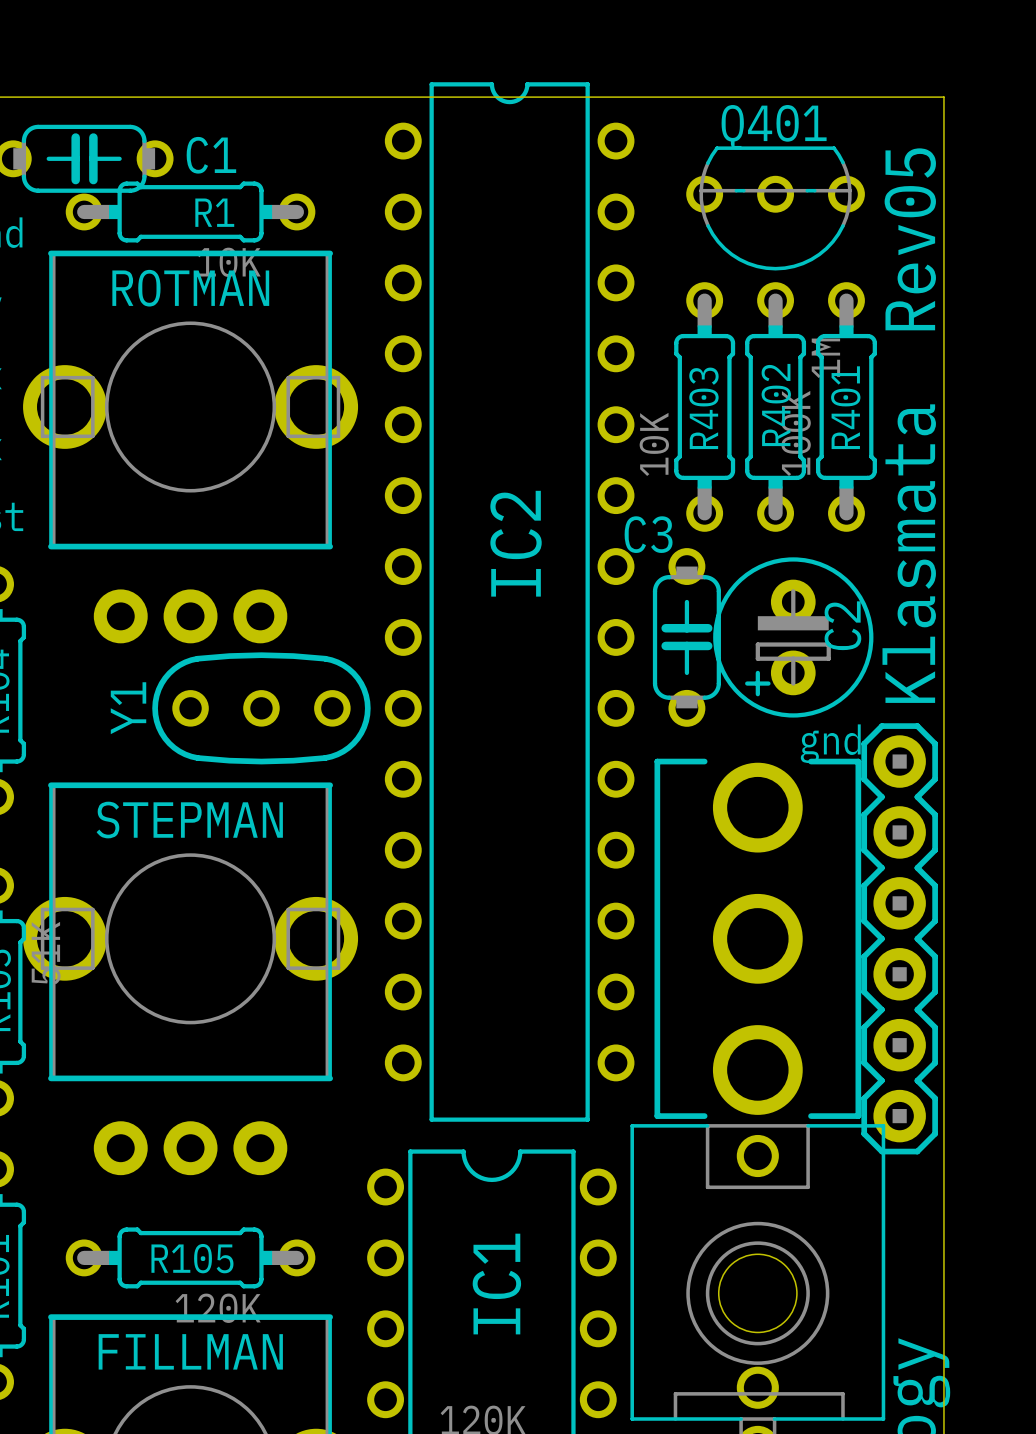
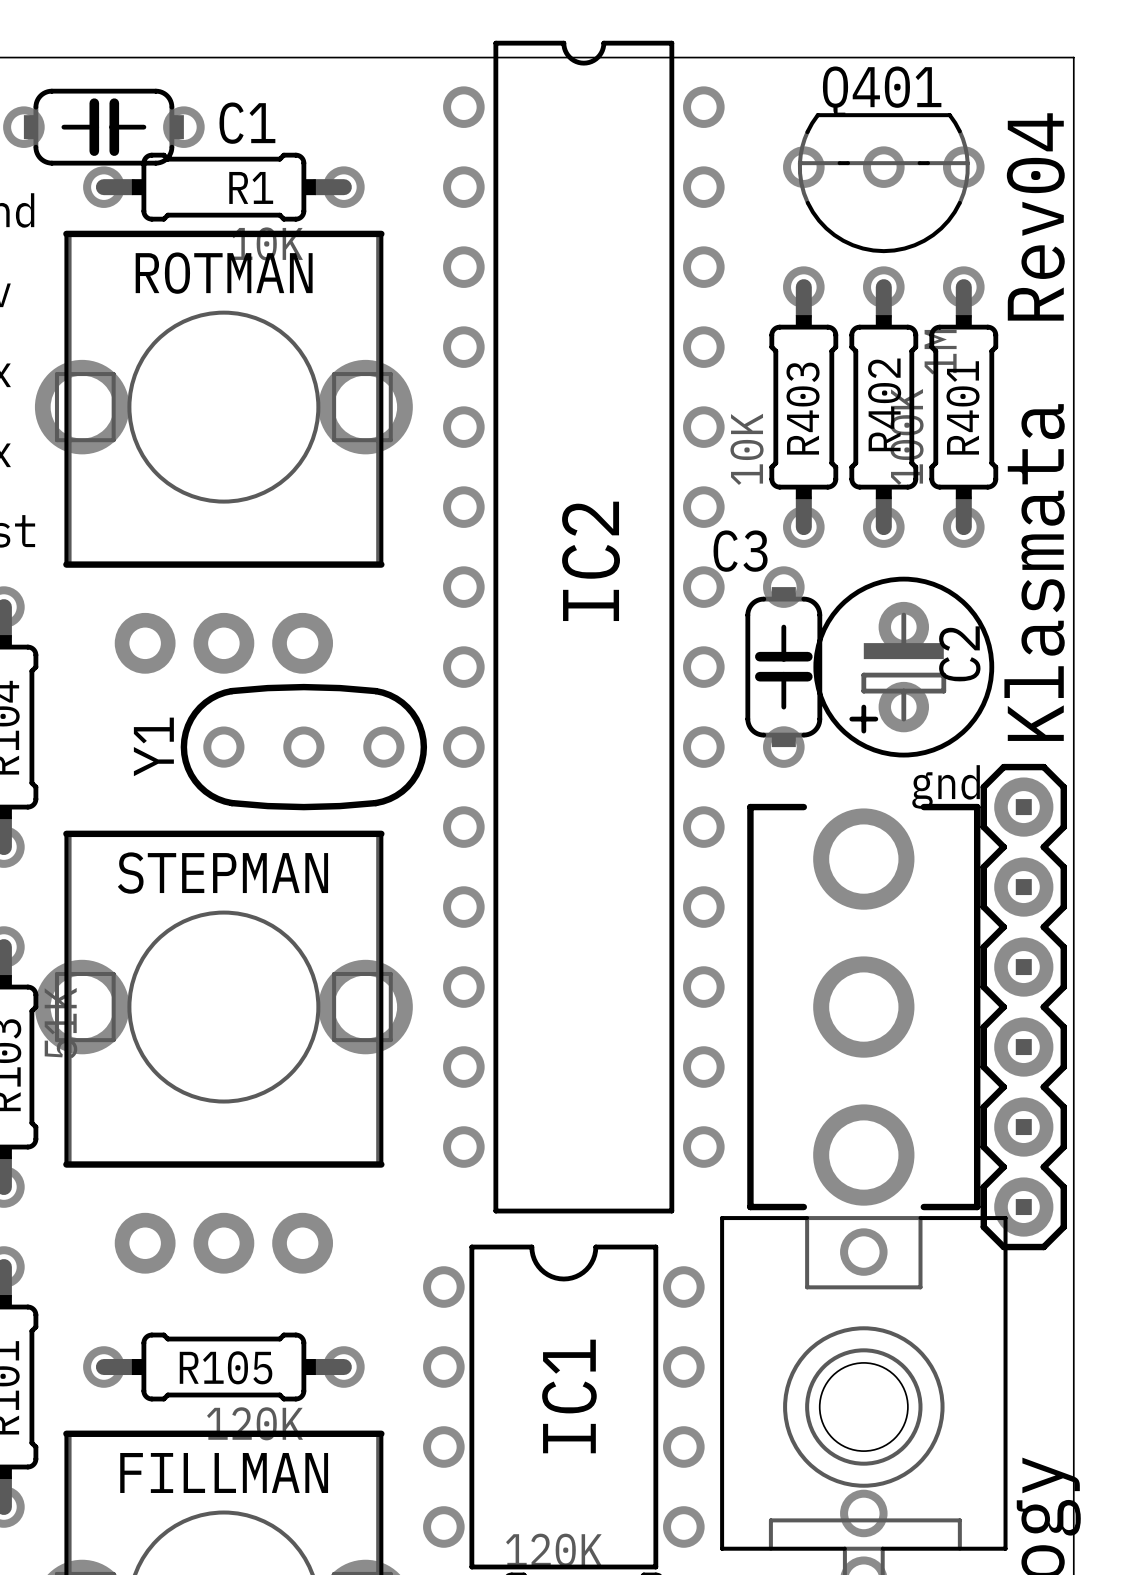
text: Rev05 (910, 239) -> Rev04 (1035, 216)

